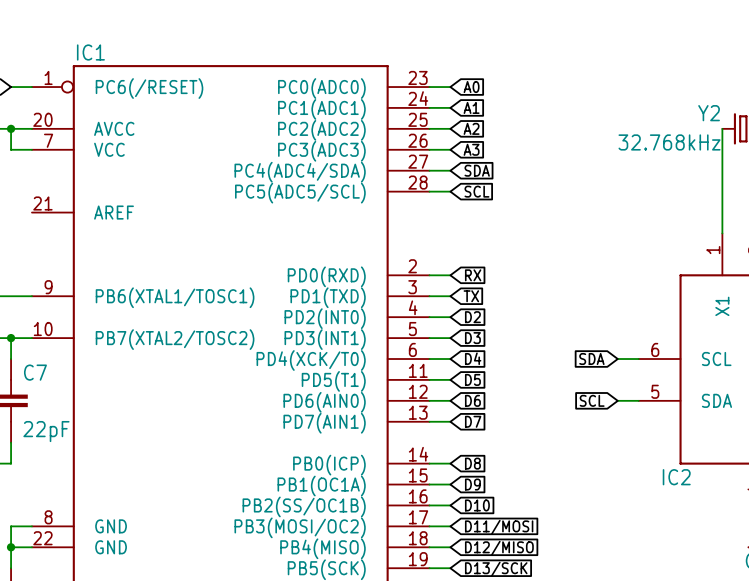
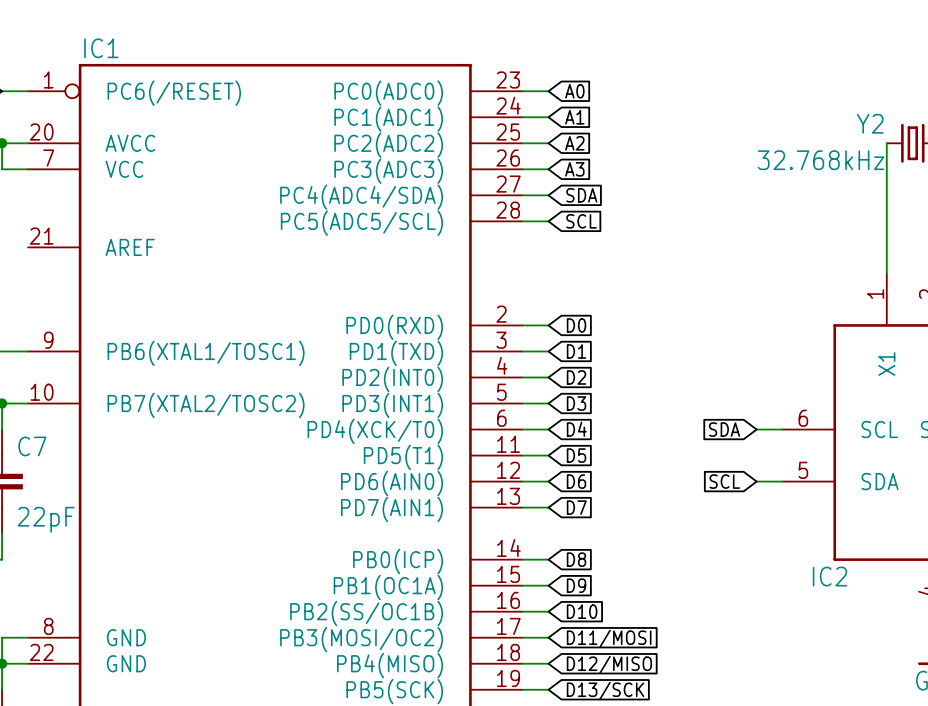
global label: RX (473, 275) -> D0 (576, 325)
global label: TX (471, 296) -> D1 (576, 351)

